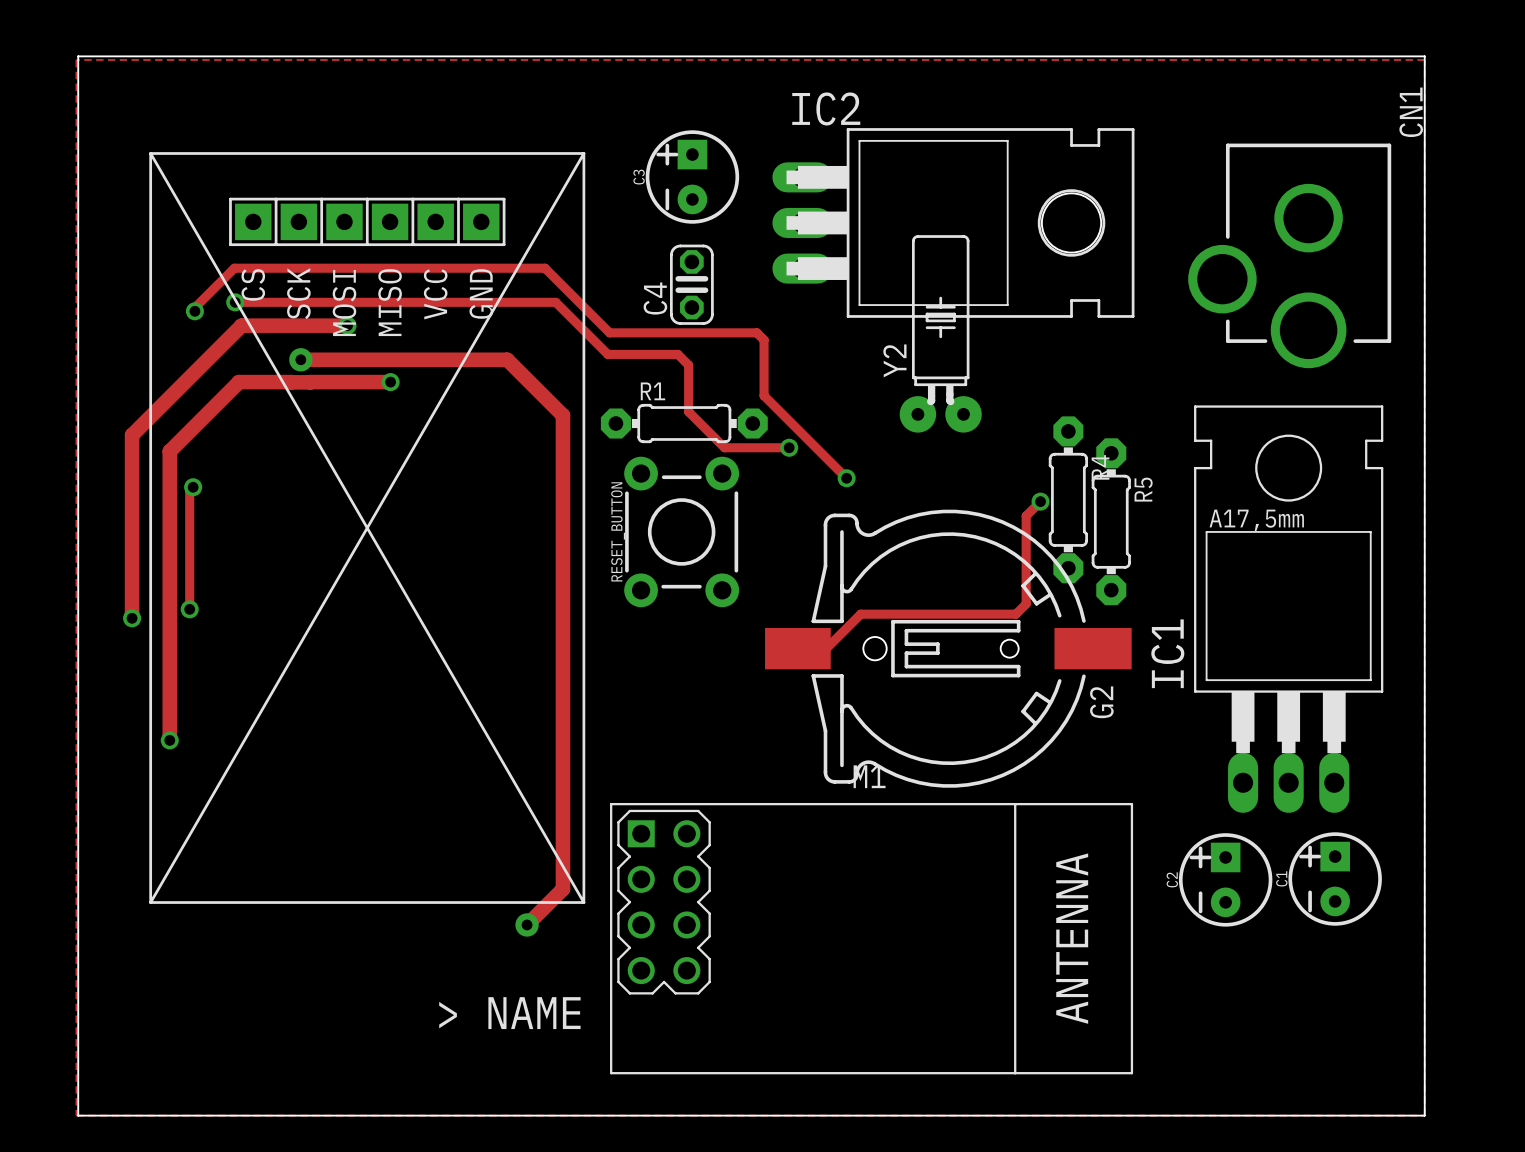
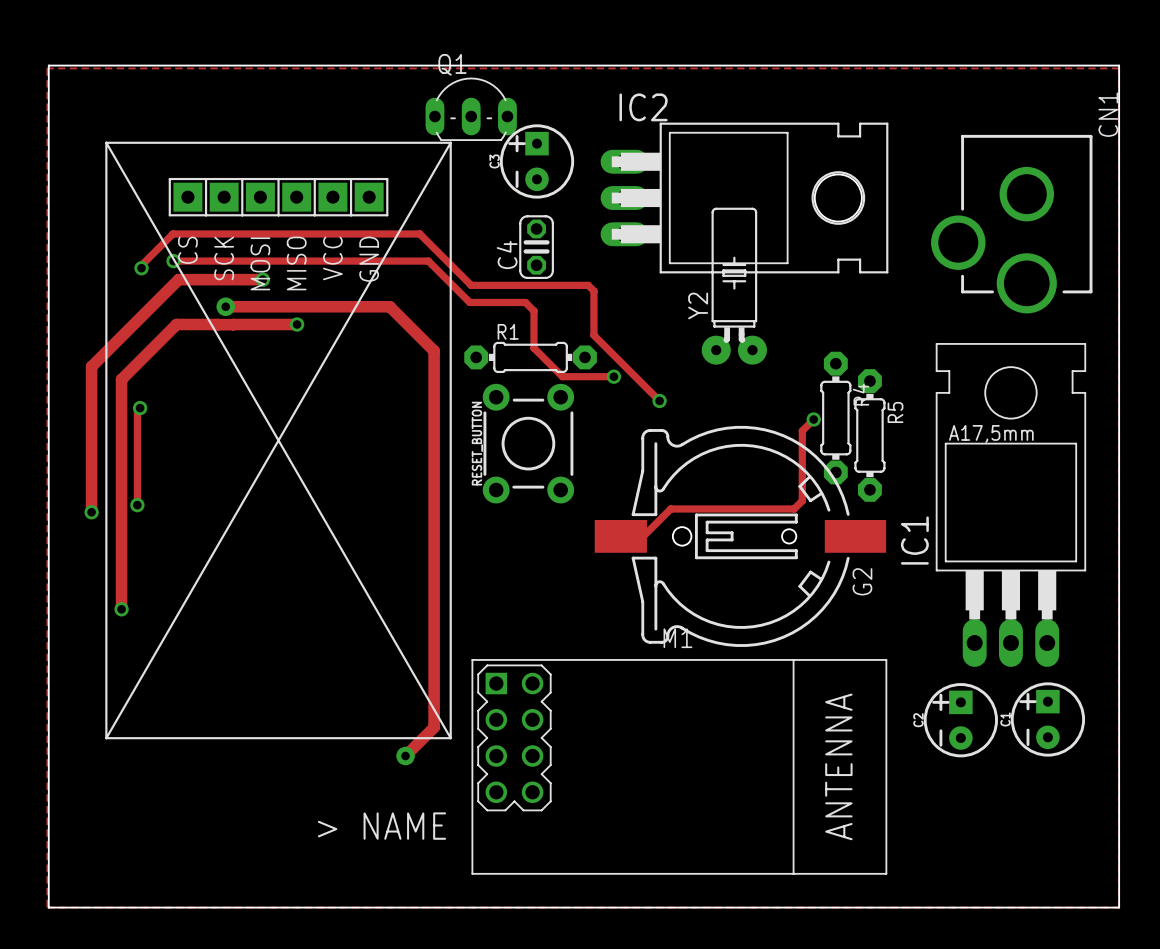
Q1: none -> (471, 109)

